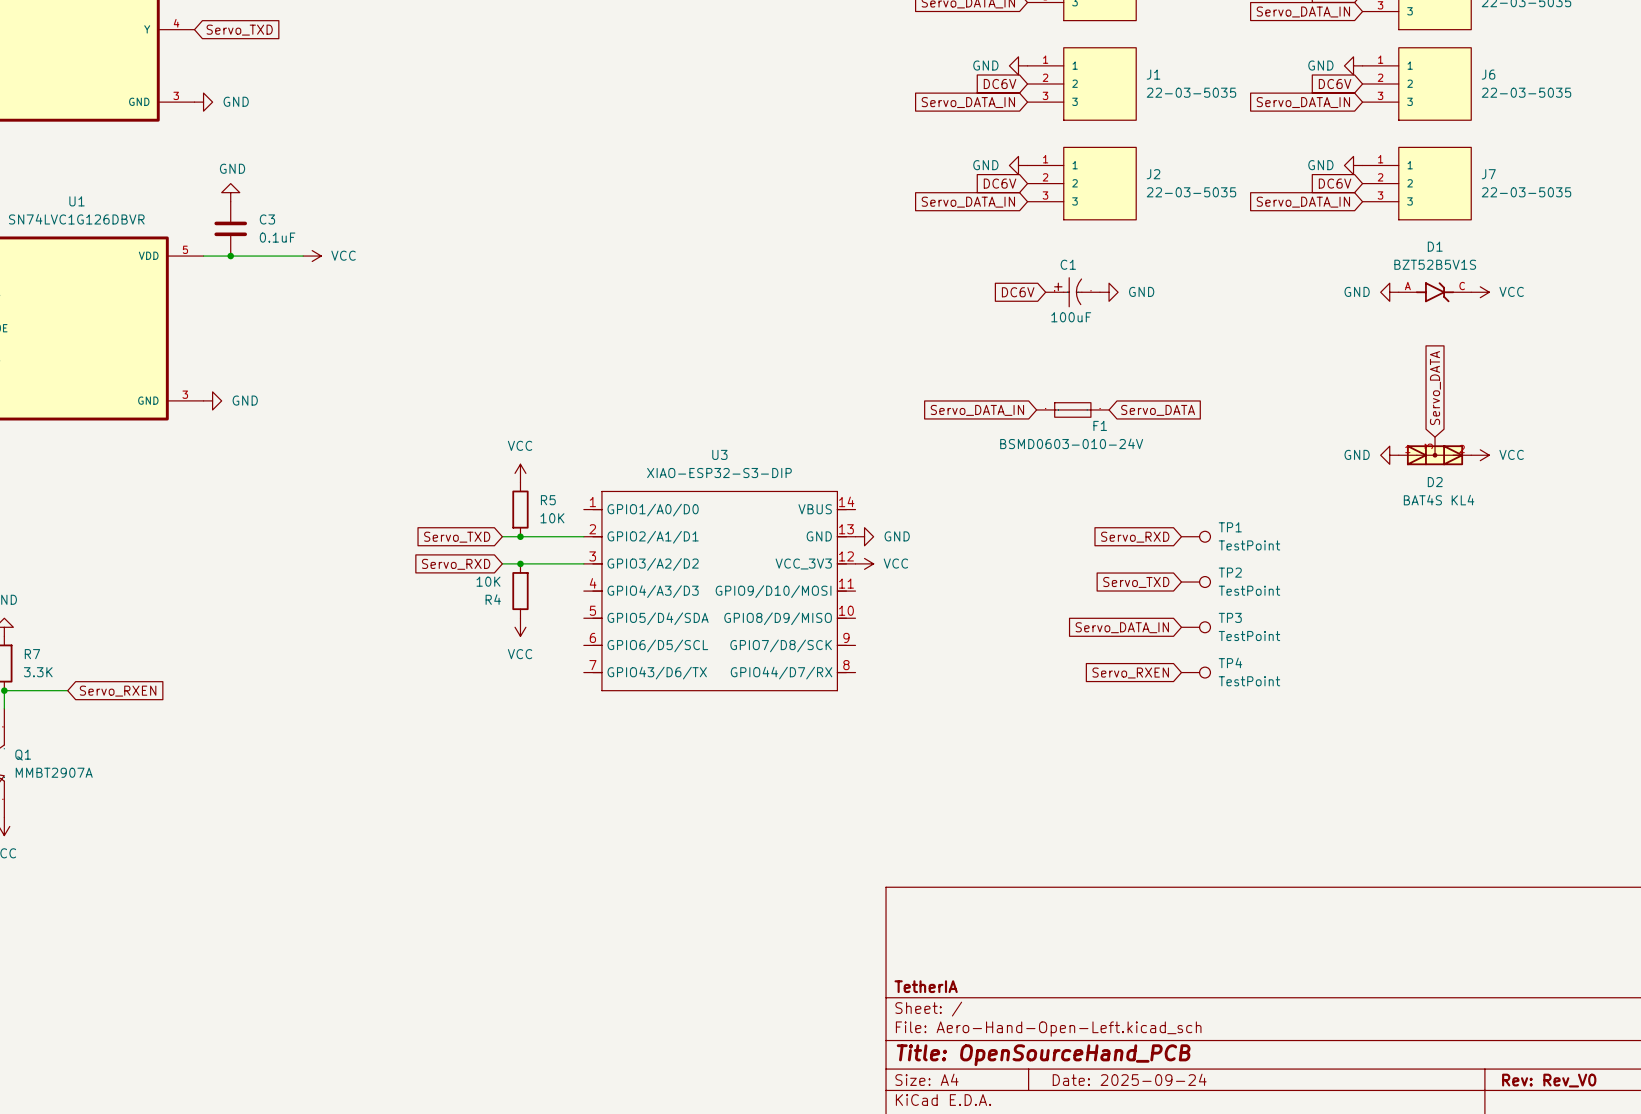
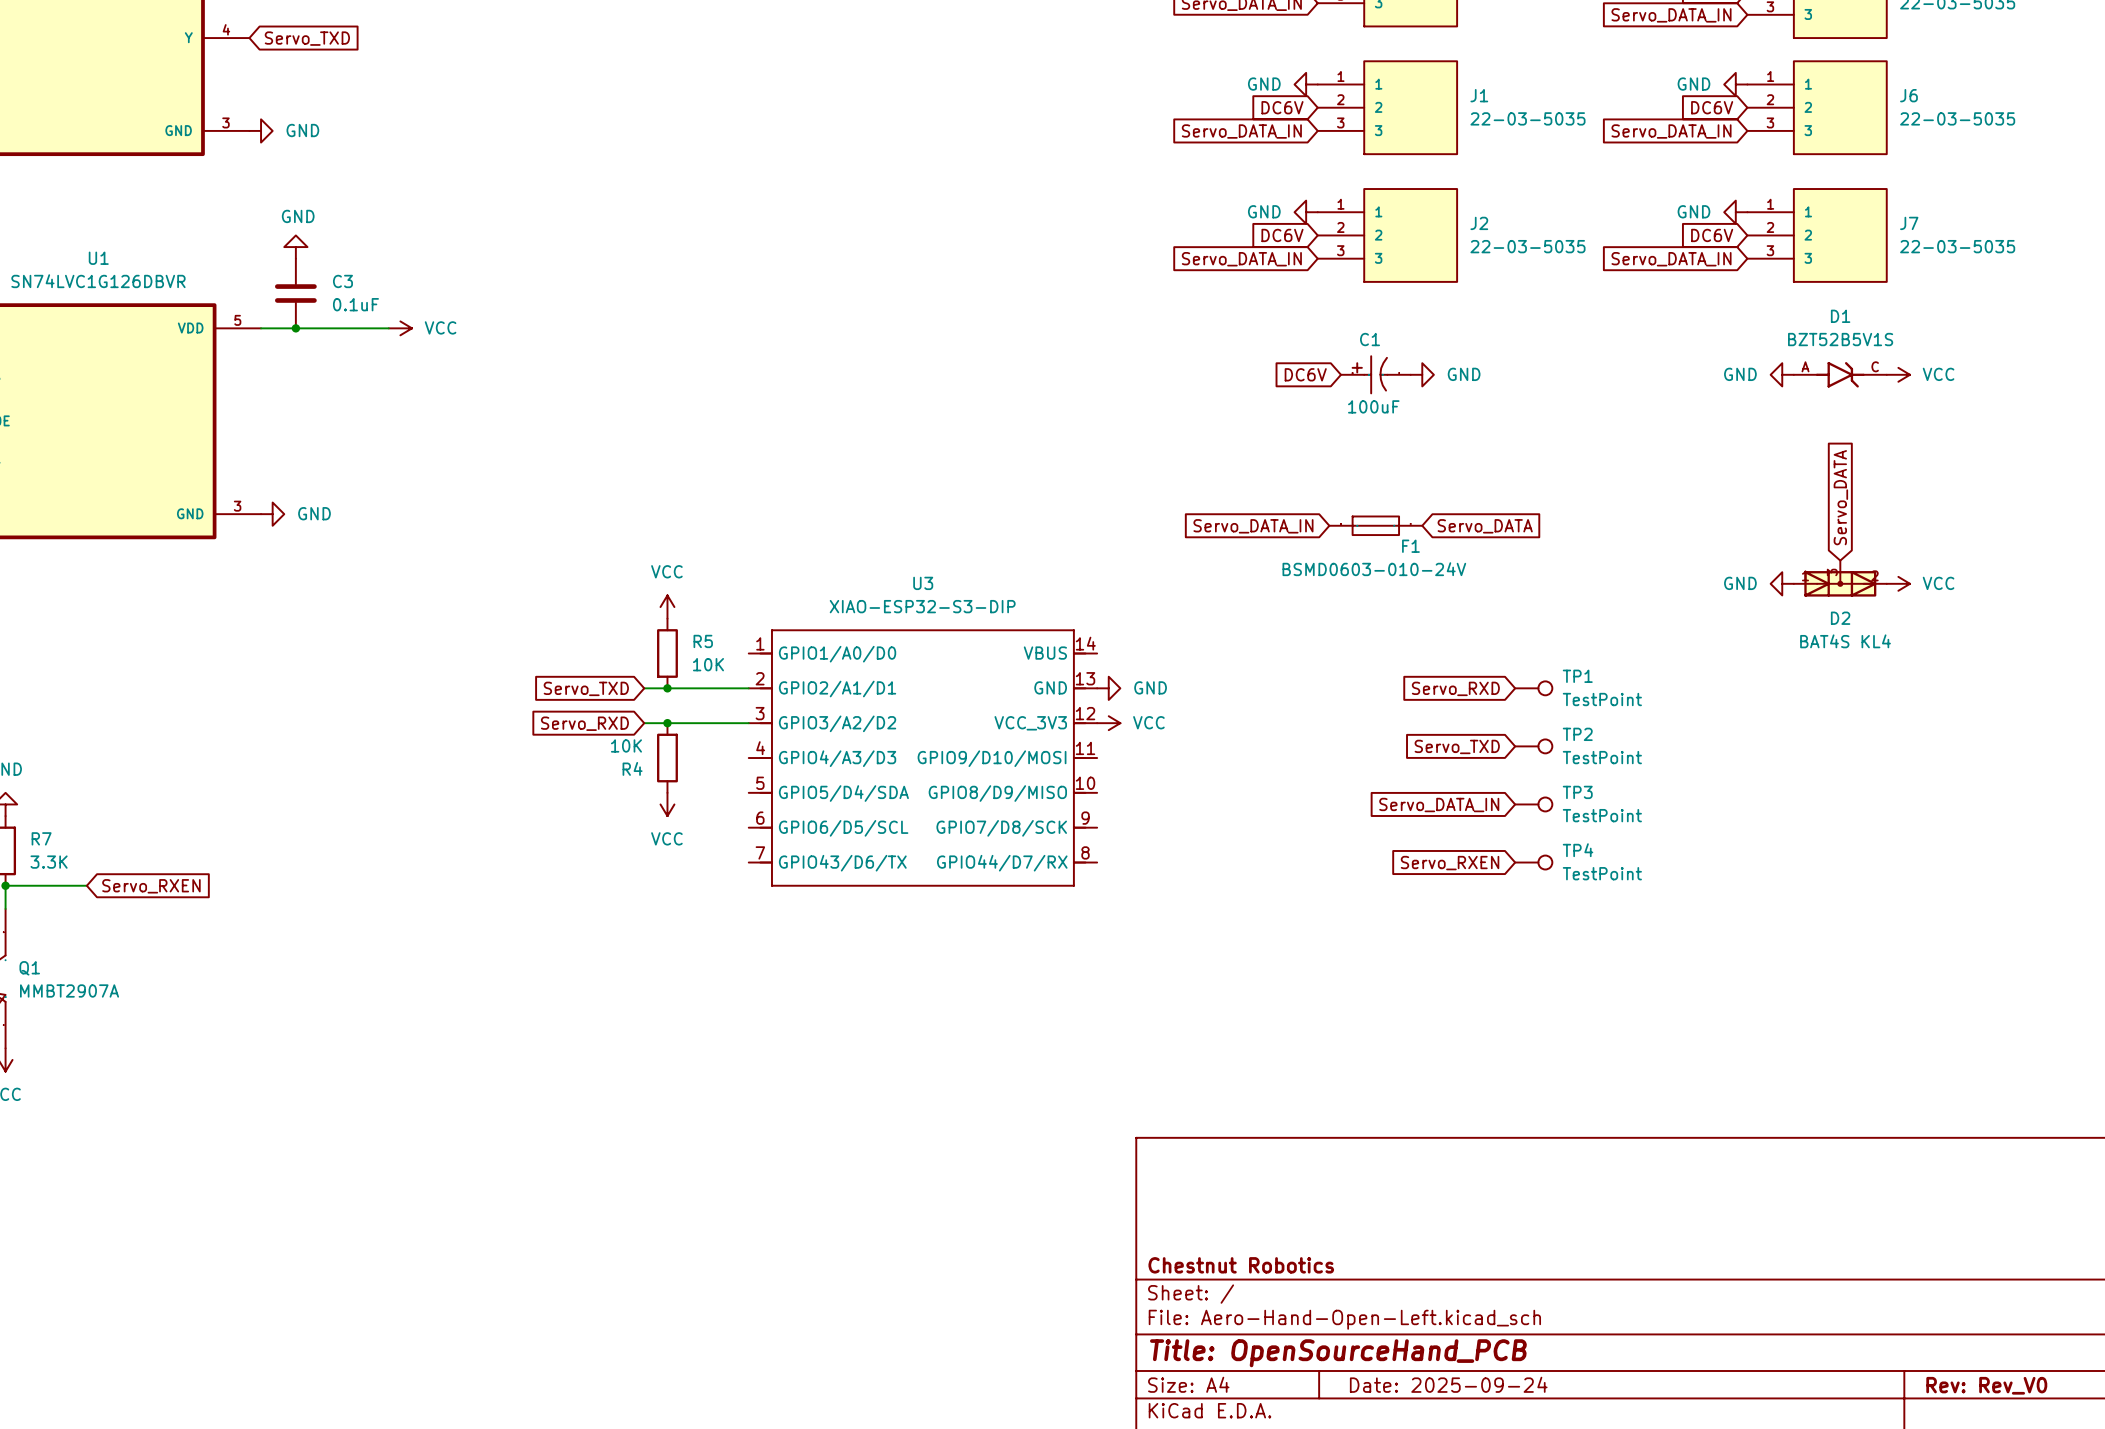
title block: TetherIA (926, 986) -> Chestnut Robotics (1241, 1265)

